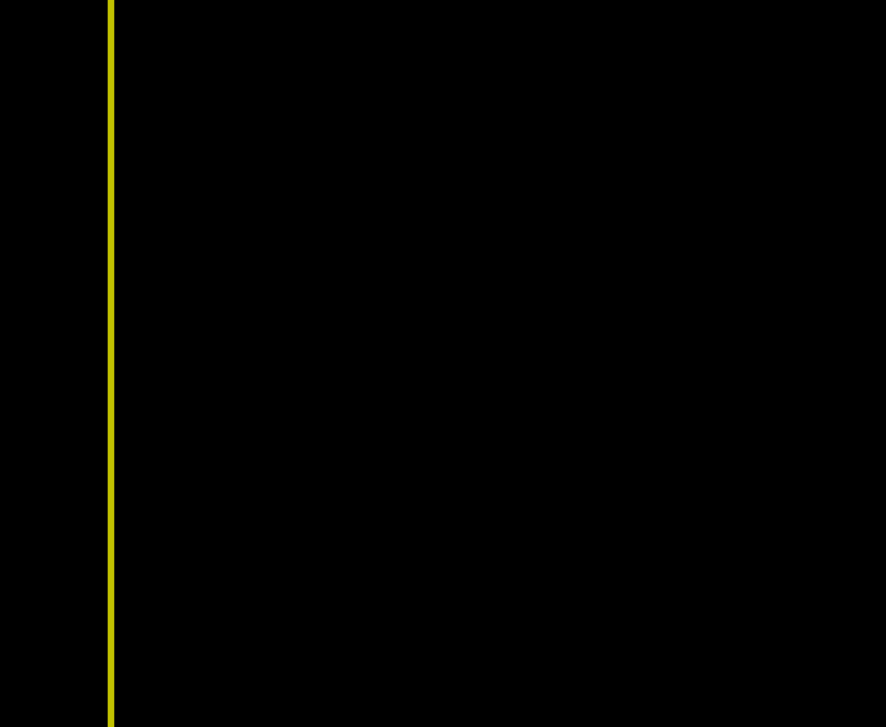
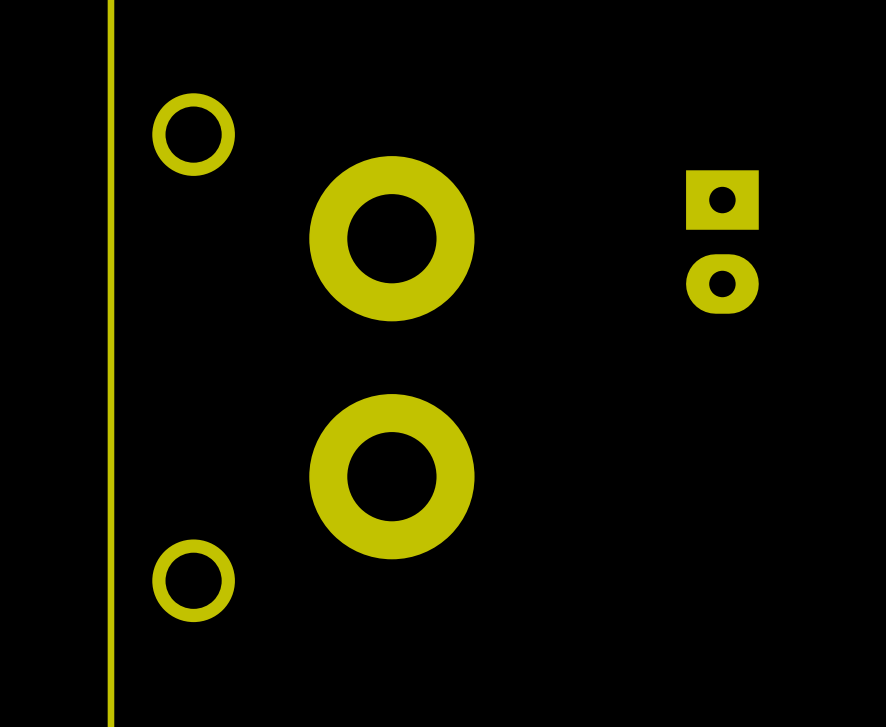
part: none -> (722, 242)
part: none -> (313, 357)

